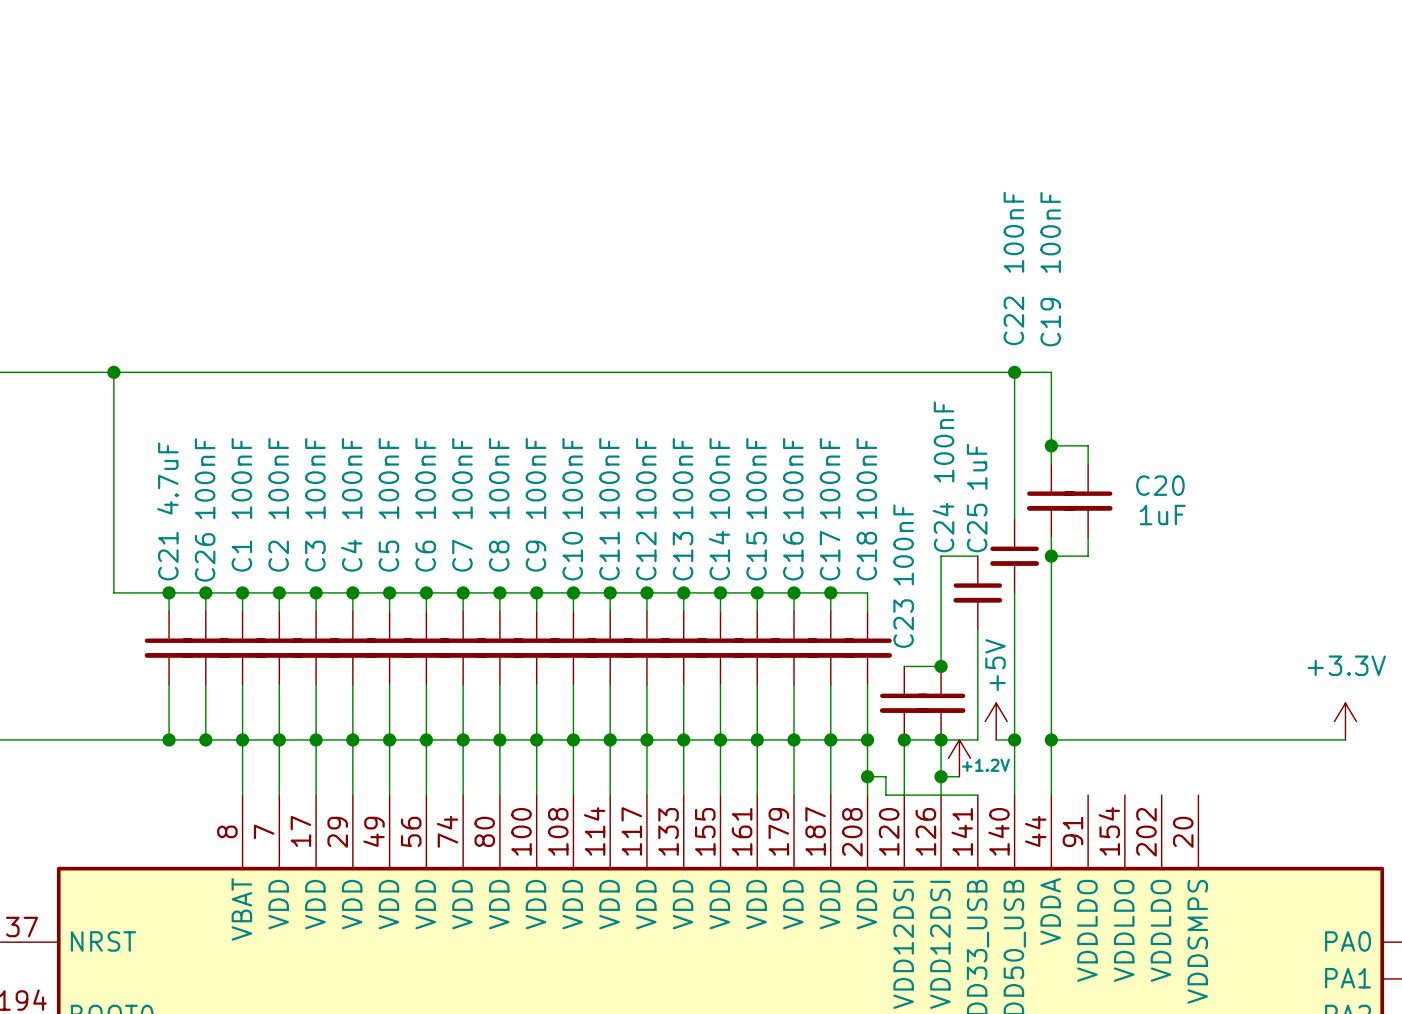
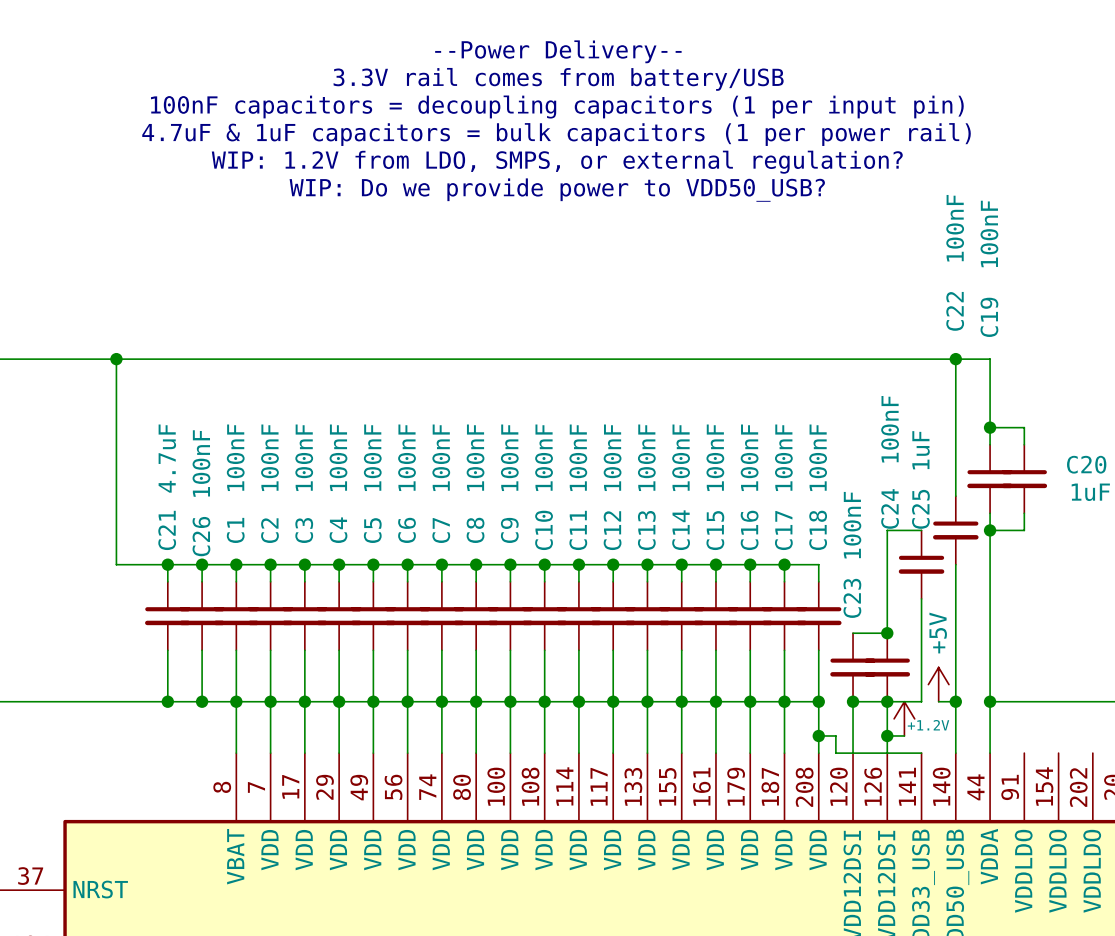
text: none -> --Power Delivery-- (558, 51)
text: none -> 3.3V rail comes from battery/USB (558, 79)
text: none -> 100nF capacitors = decoupling capacitors (1 per input pin) (557, 107)
text: none -> 4.7uF & 1uF capacitors = bulk capacitors (1 per power rail) (556, 134)
text: none -> WIP: 1.2V from LDO, SMPS, or external regulation? (557, 162)
text: none -> WIP: Do we provide power to VDD50_USB? (557, 190)

